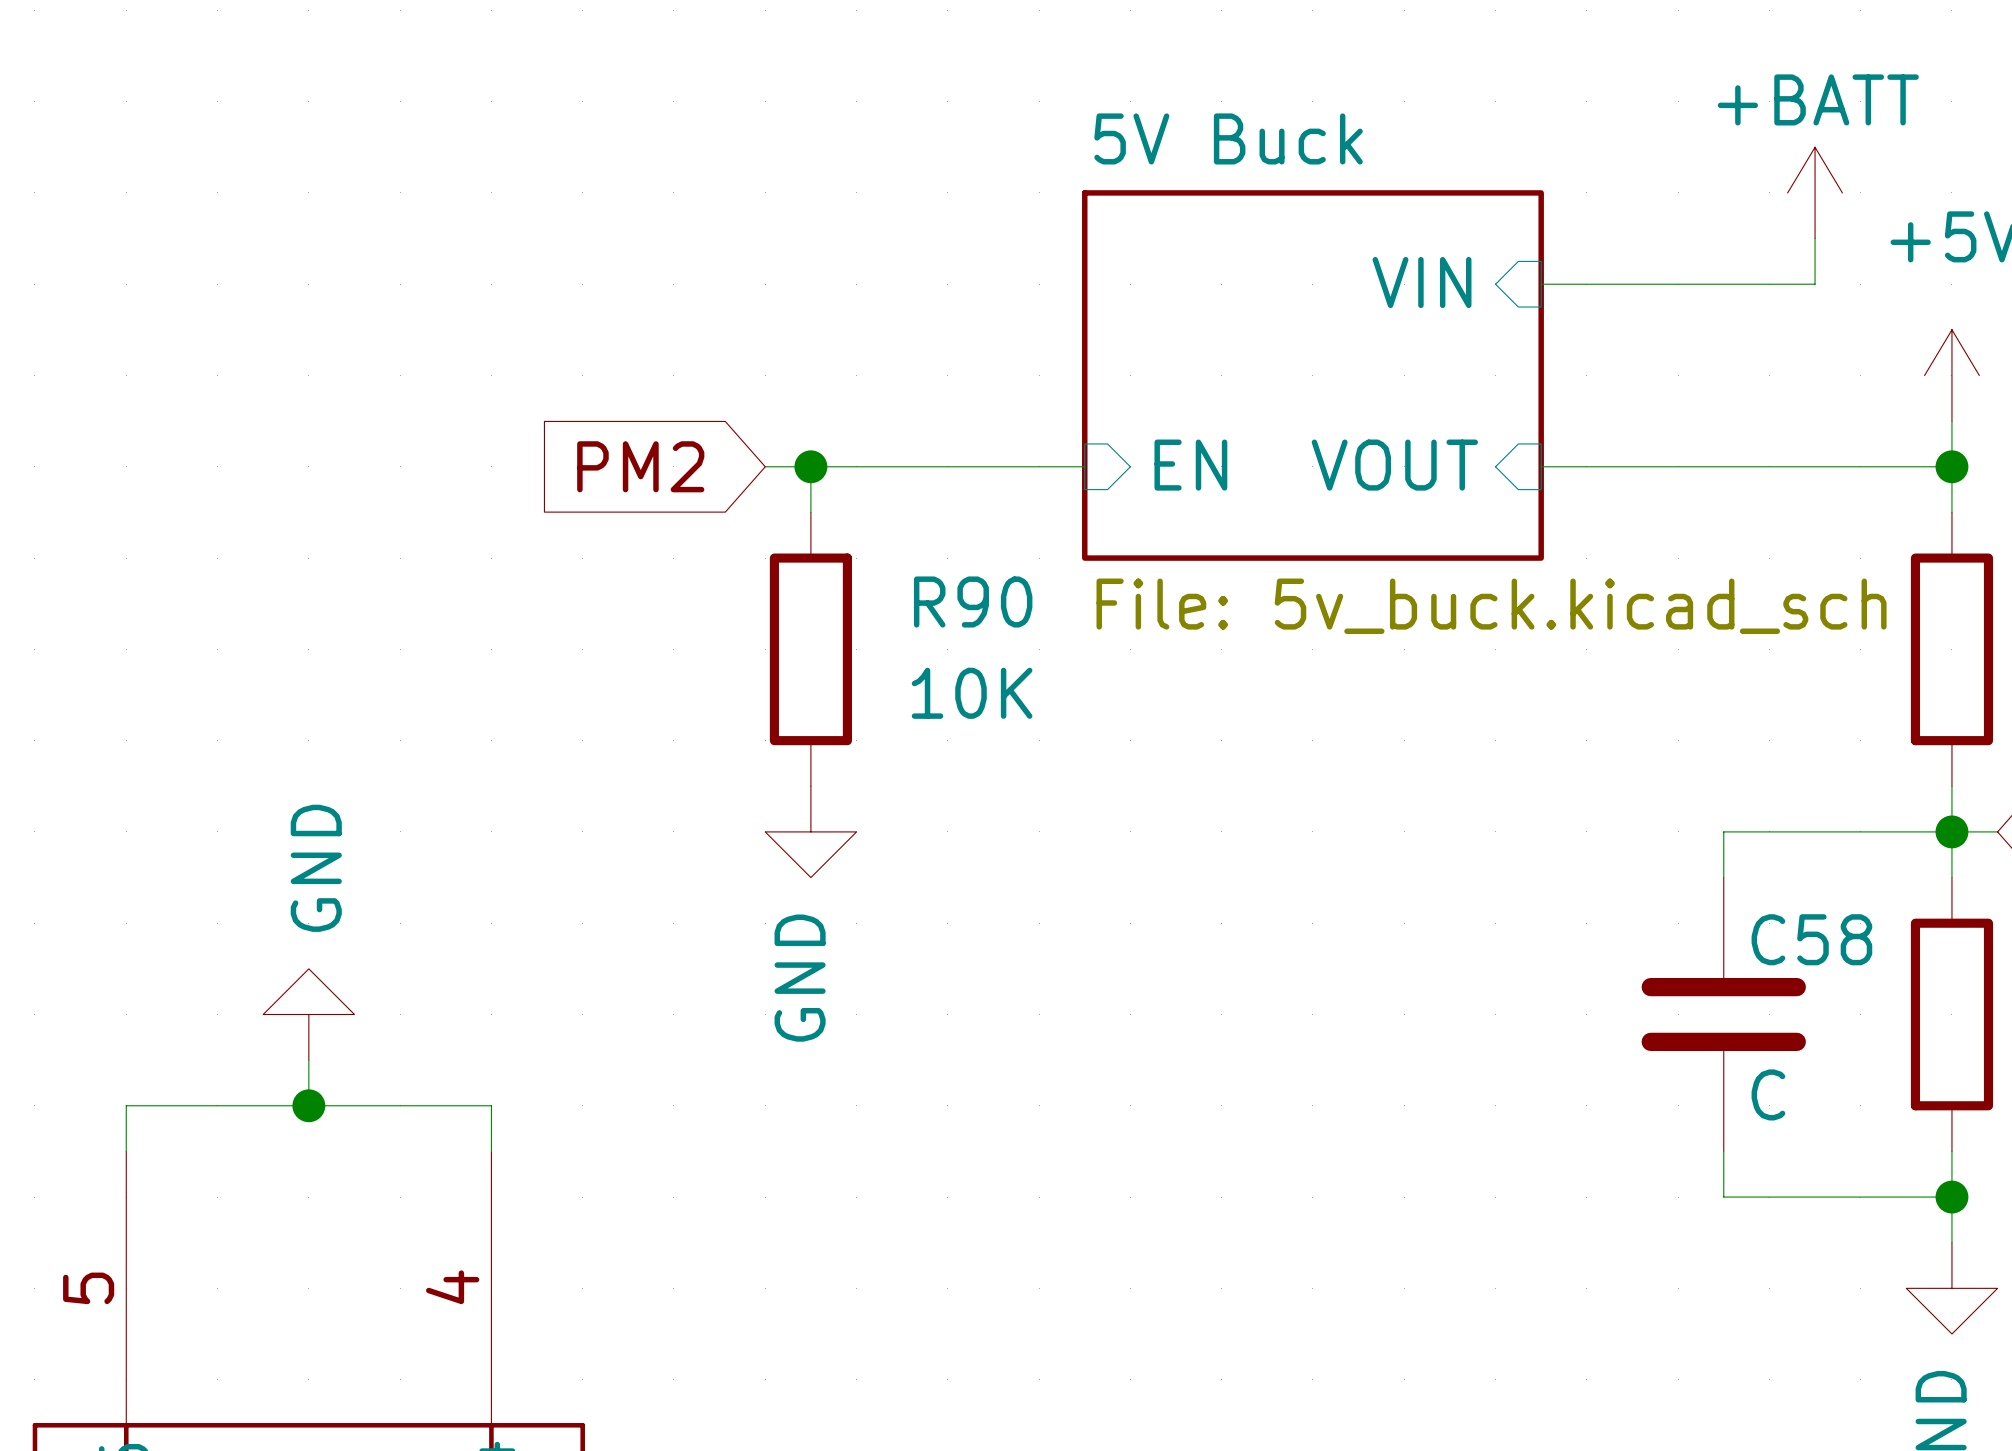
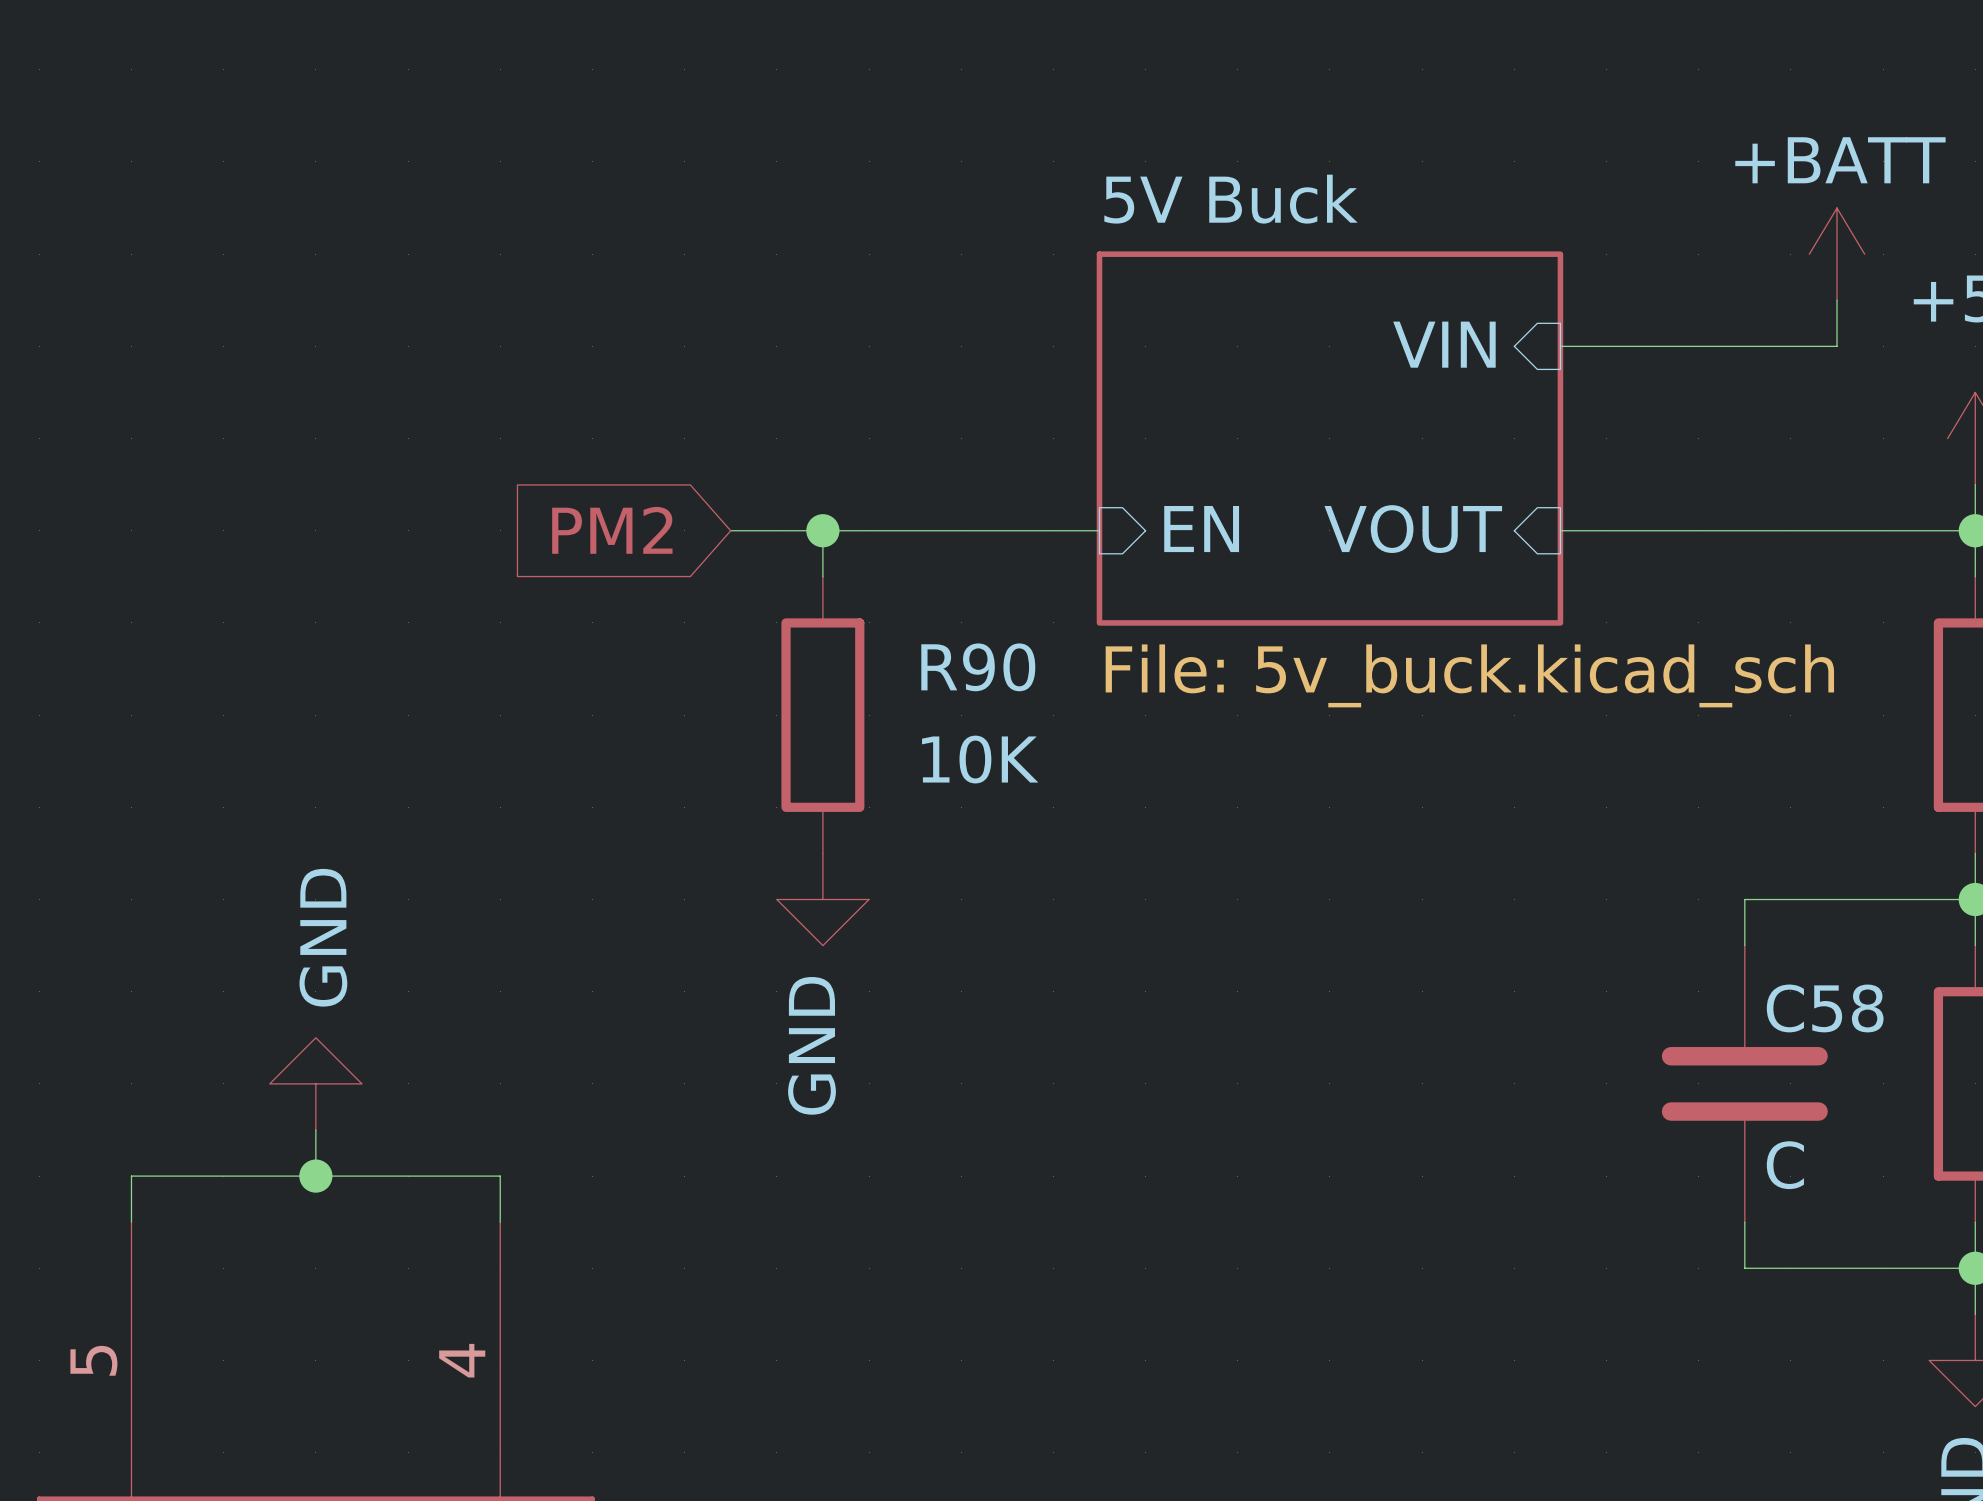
global label position: PM2 (640, 466) -> PM2 (612, 530)
wire: none -> (730, 530) (776, 530)

